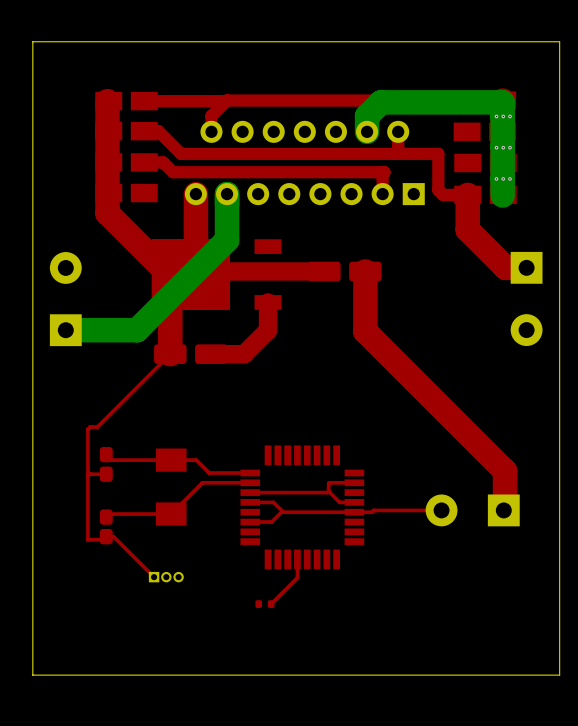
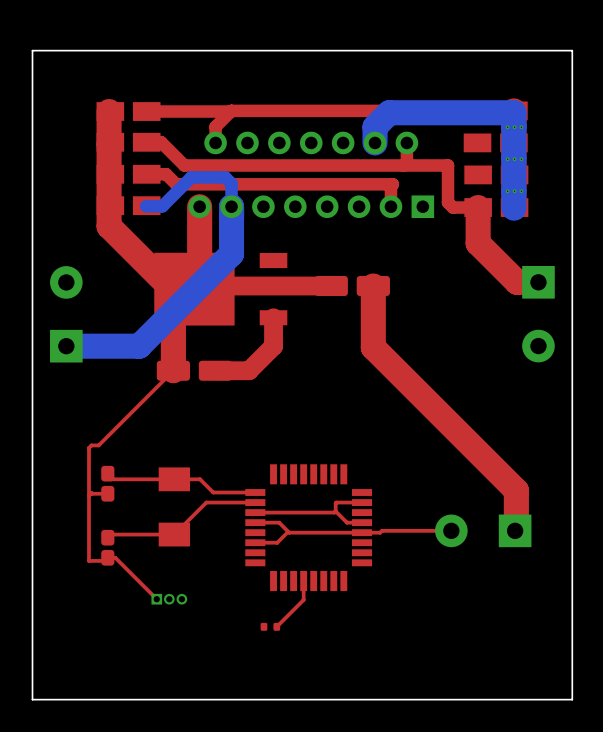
bottom track: none -> (146, 206) (162, 206) (191, 177) (225, 177) (231, 183) (231, 206)

